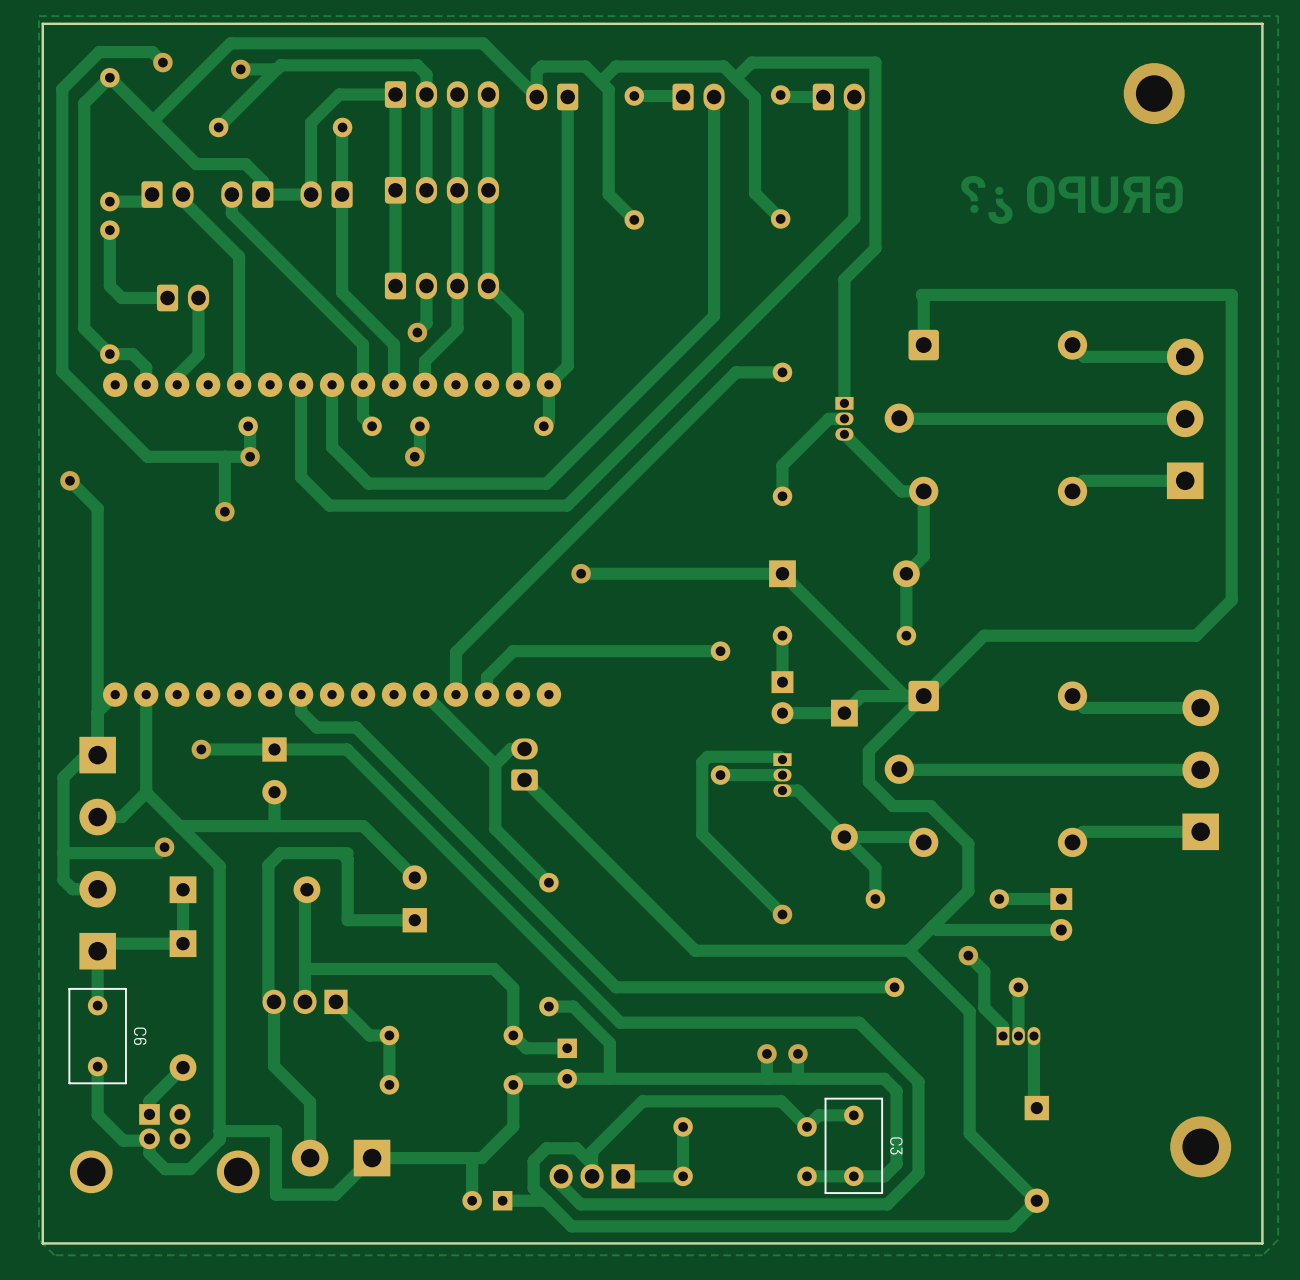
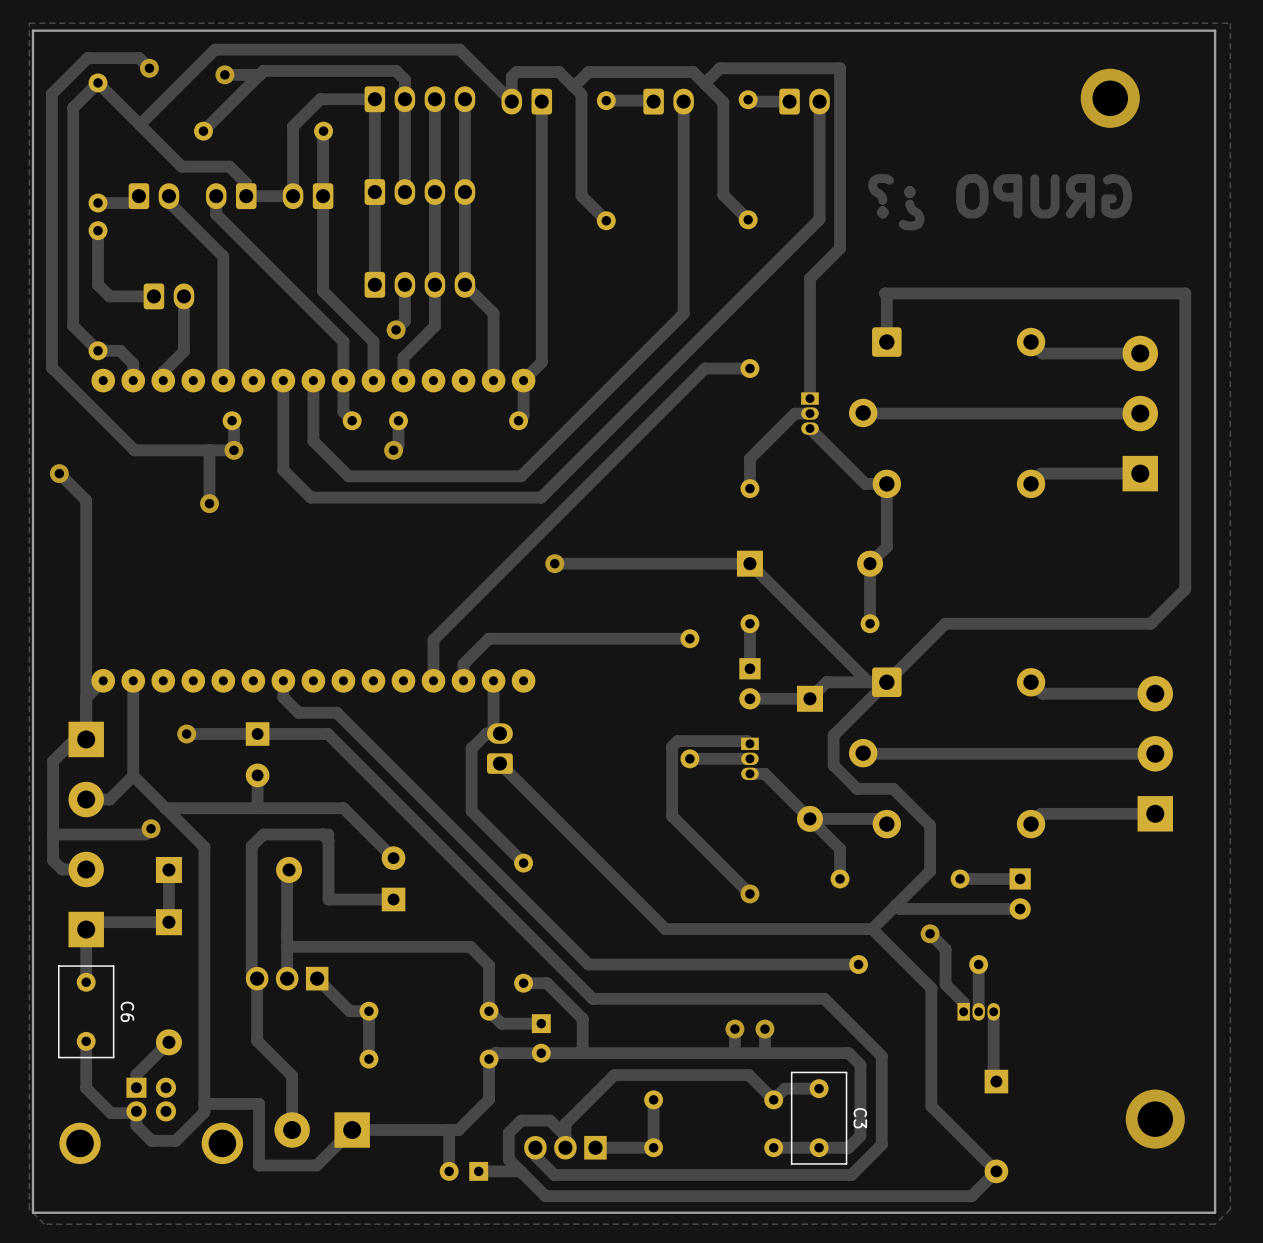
track: (425, 694) (495, 764) -> none
track: none -> (493, 680) (493, 727) (499, 733)

